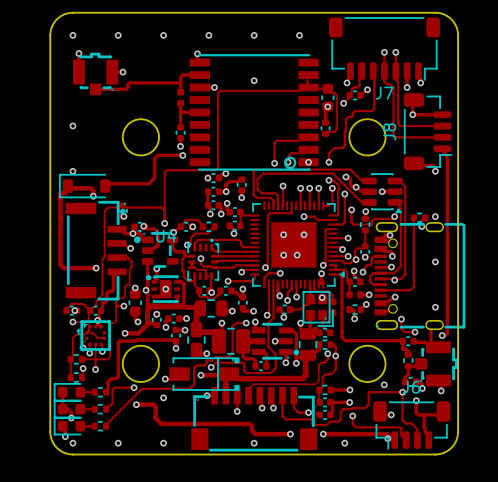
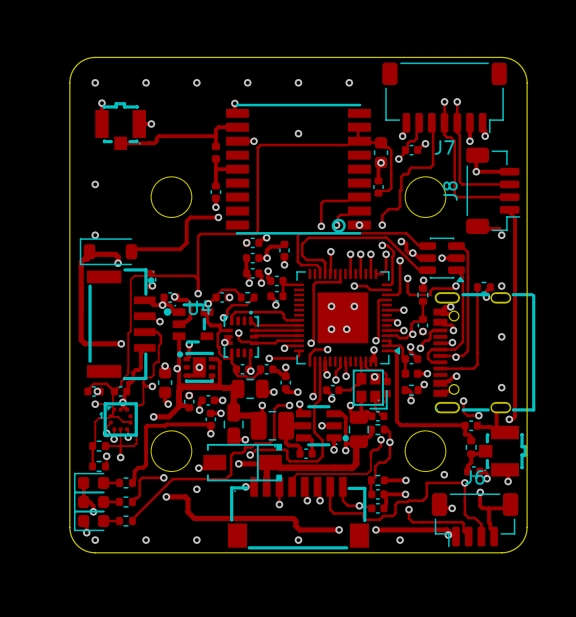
via: none -> (224, 342)
track: (194, 267) (197, 269) (206, 269) (206, 276) (211, 276) -> none

